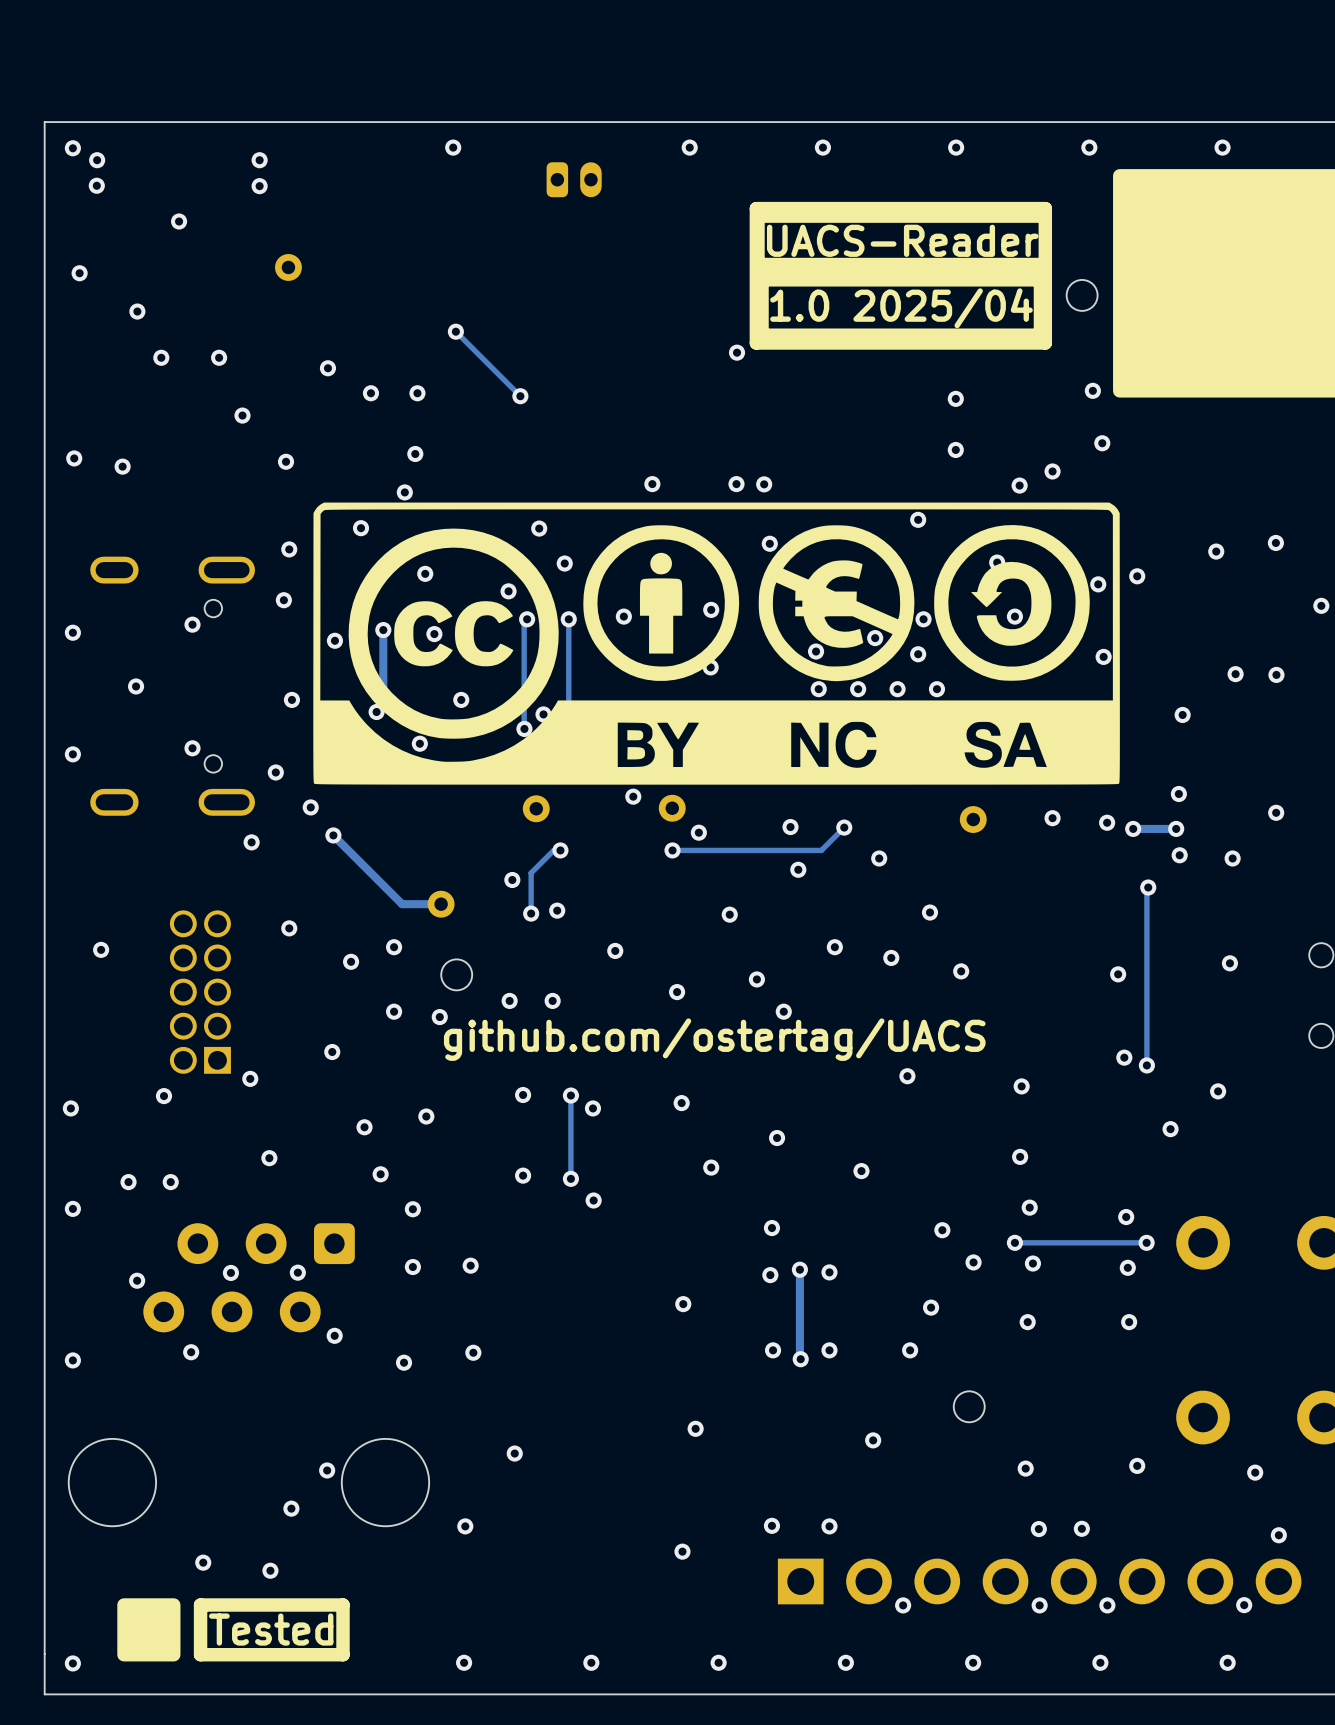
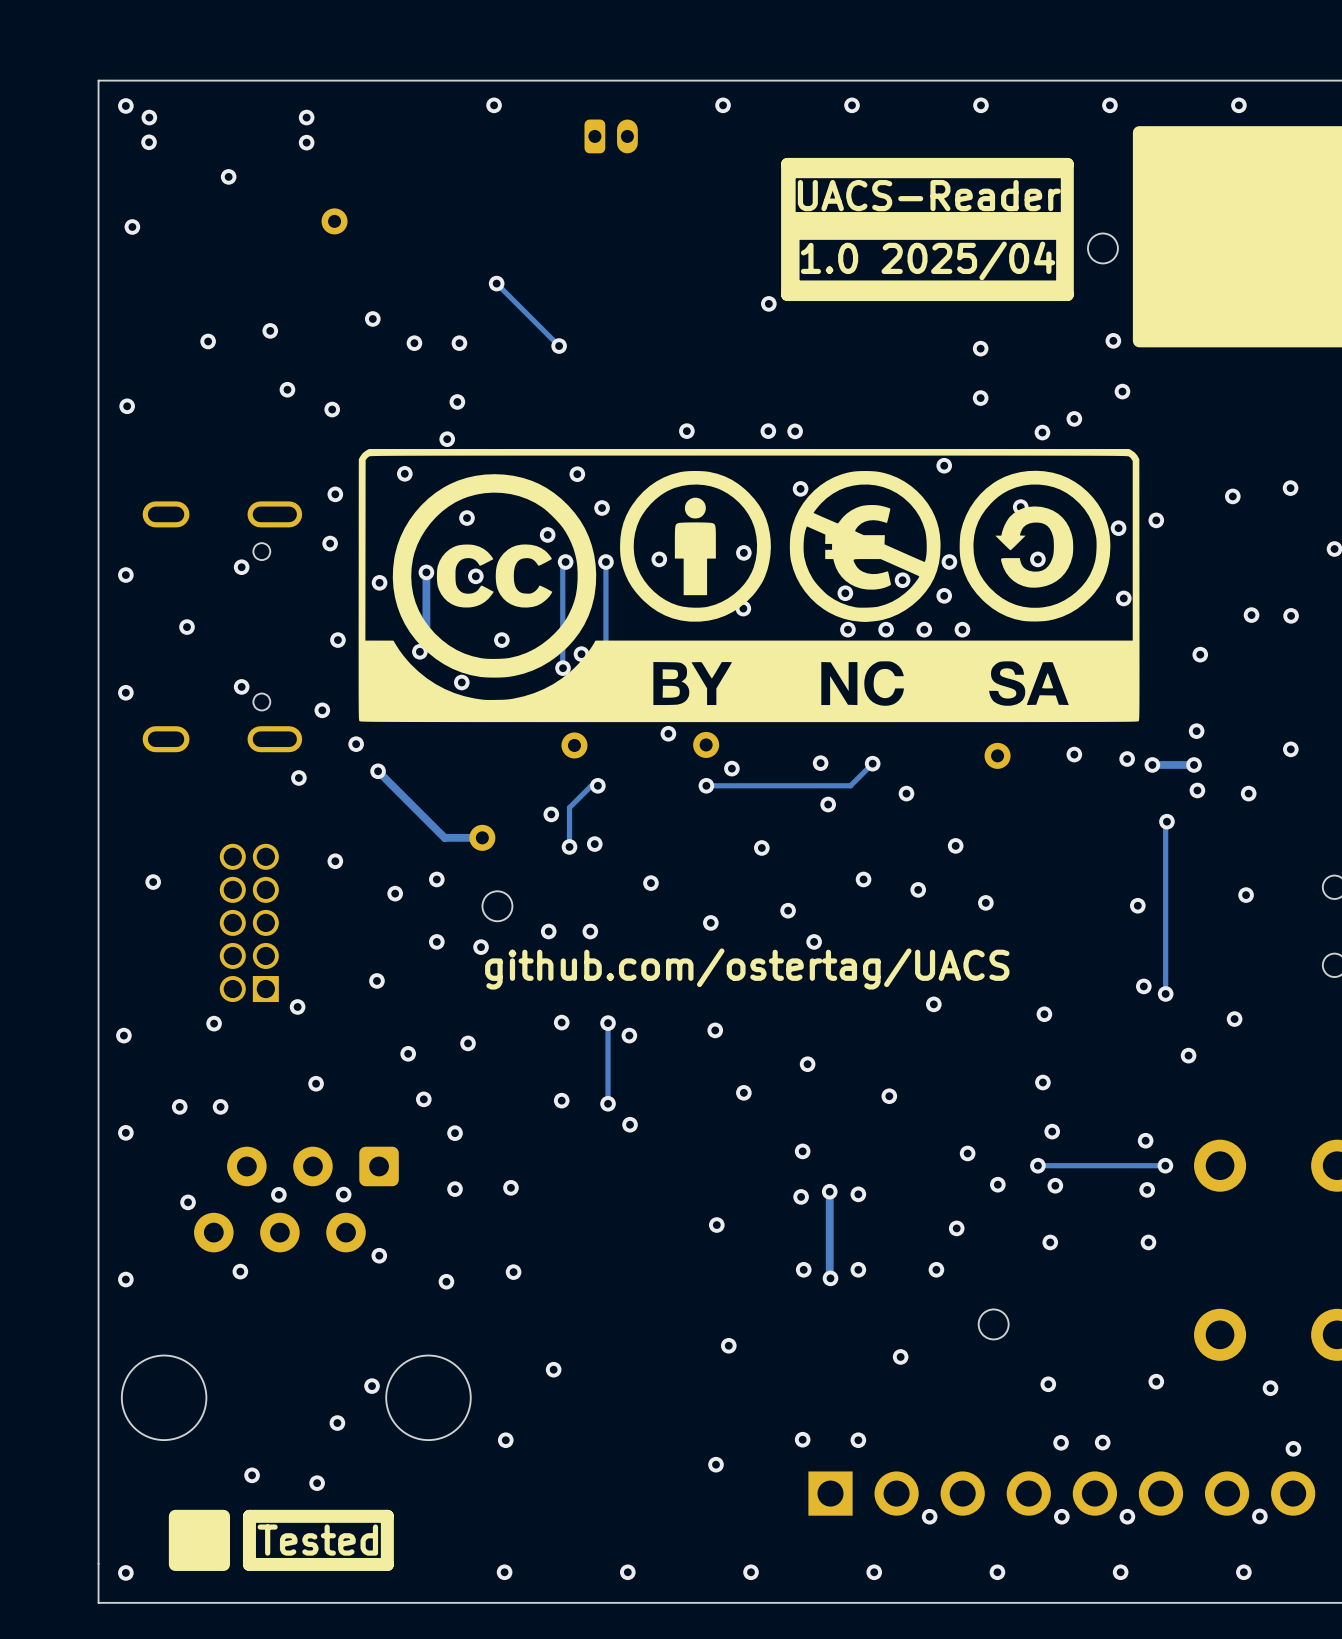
via: (137, 311) -> none
via: (161, 357) -> none
via: (219, 357) -> none
via: none -> (270, 330)
via: none -> (208, 341)
via: (242, 415) -> none
via: none -> (287, 389)
via: (122, 466) -> none

